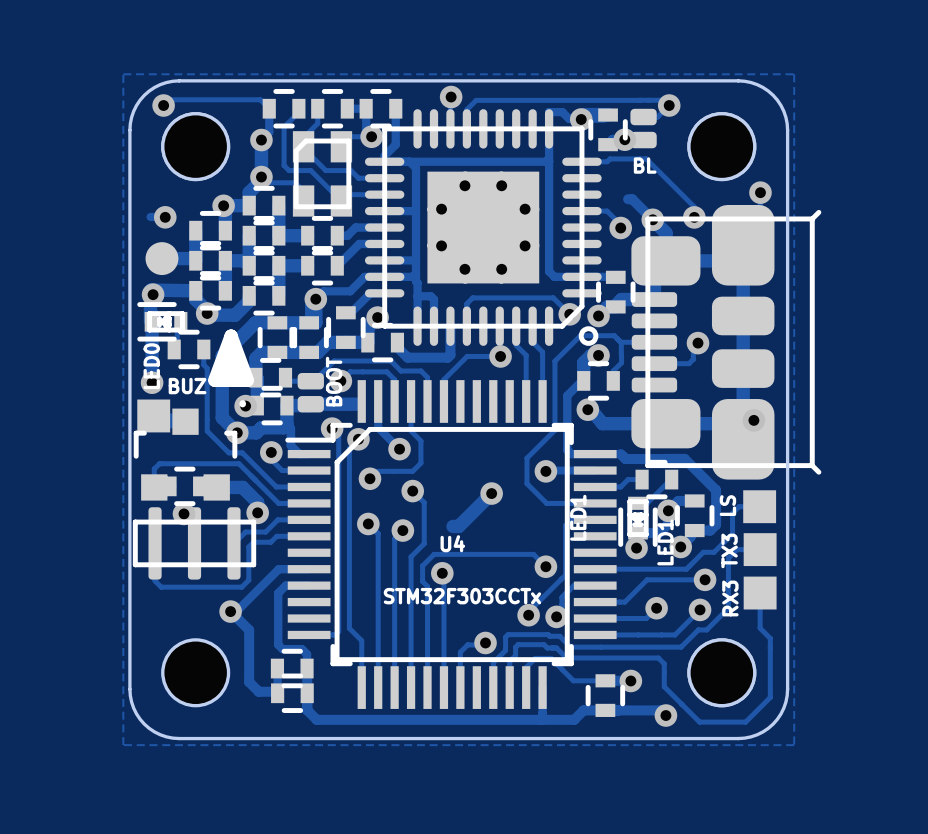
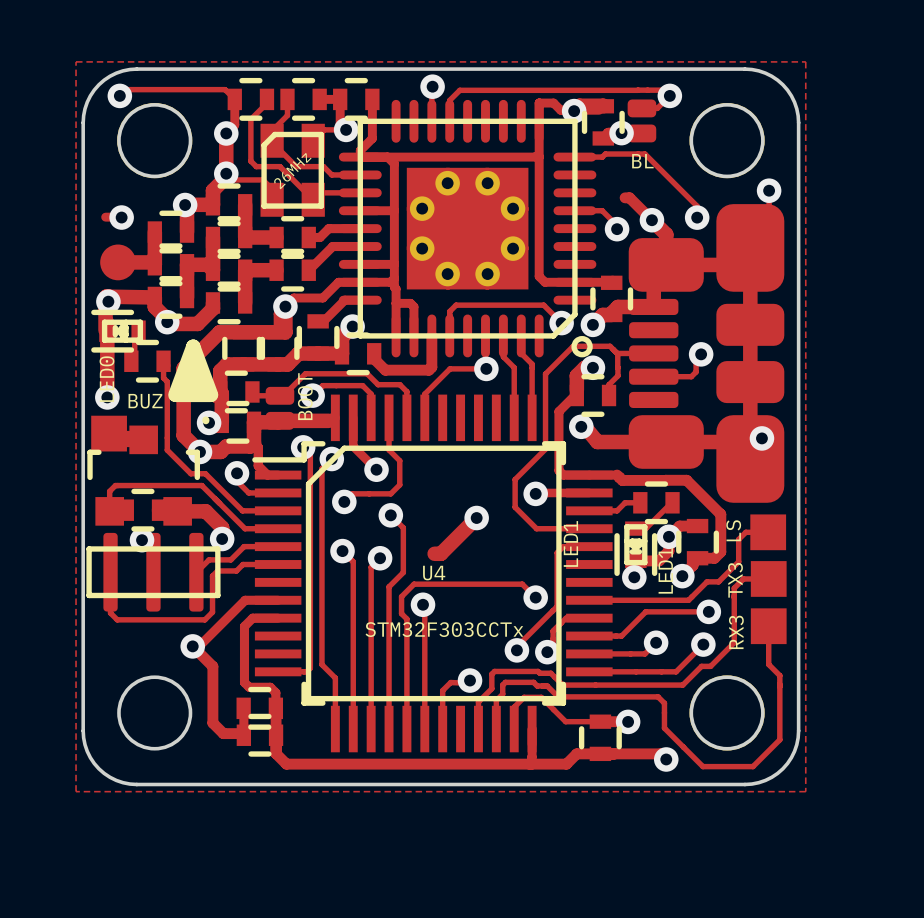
part value: none -> 26MHz (292, 171)
part footprint: [631, 204, 822, 480] -> [628, 204, 785, 503]

